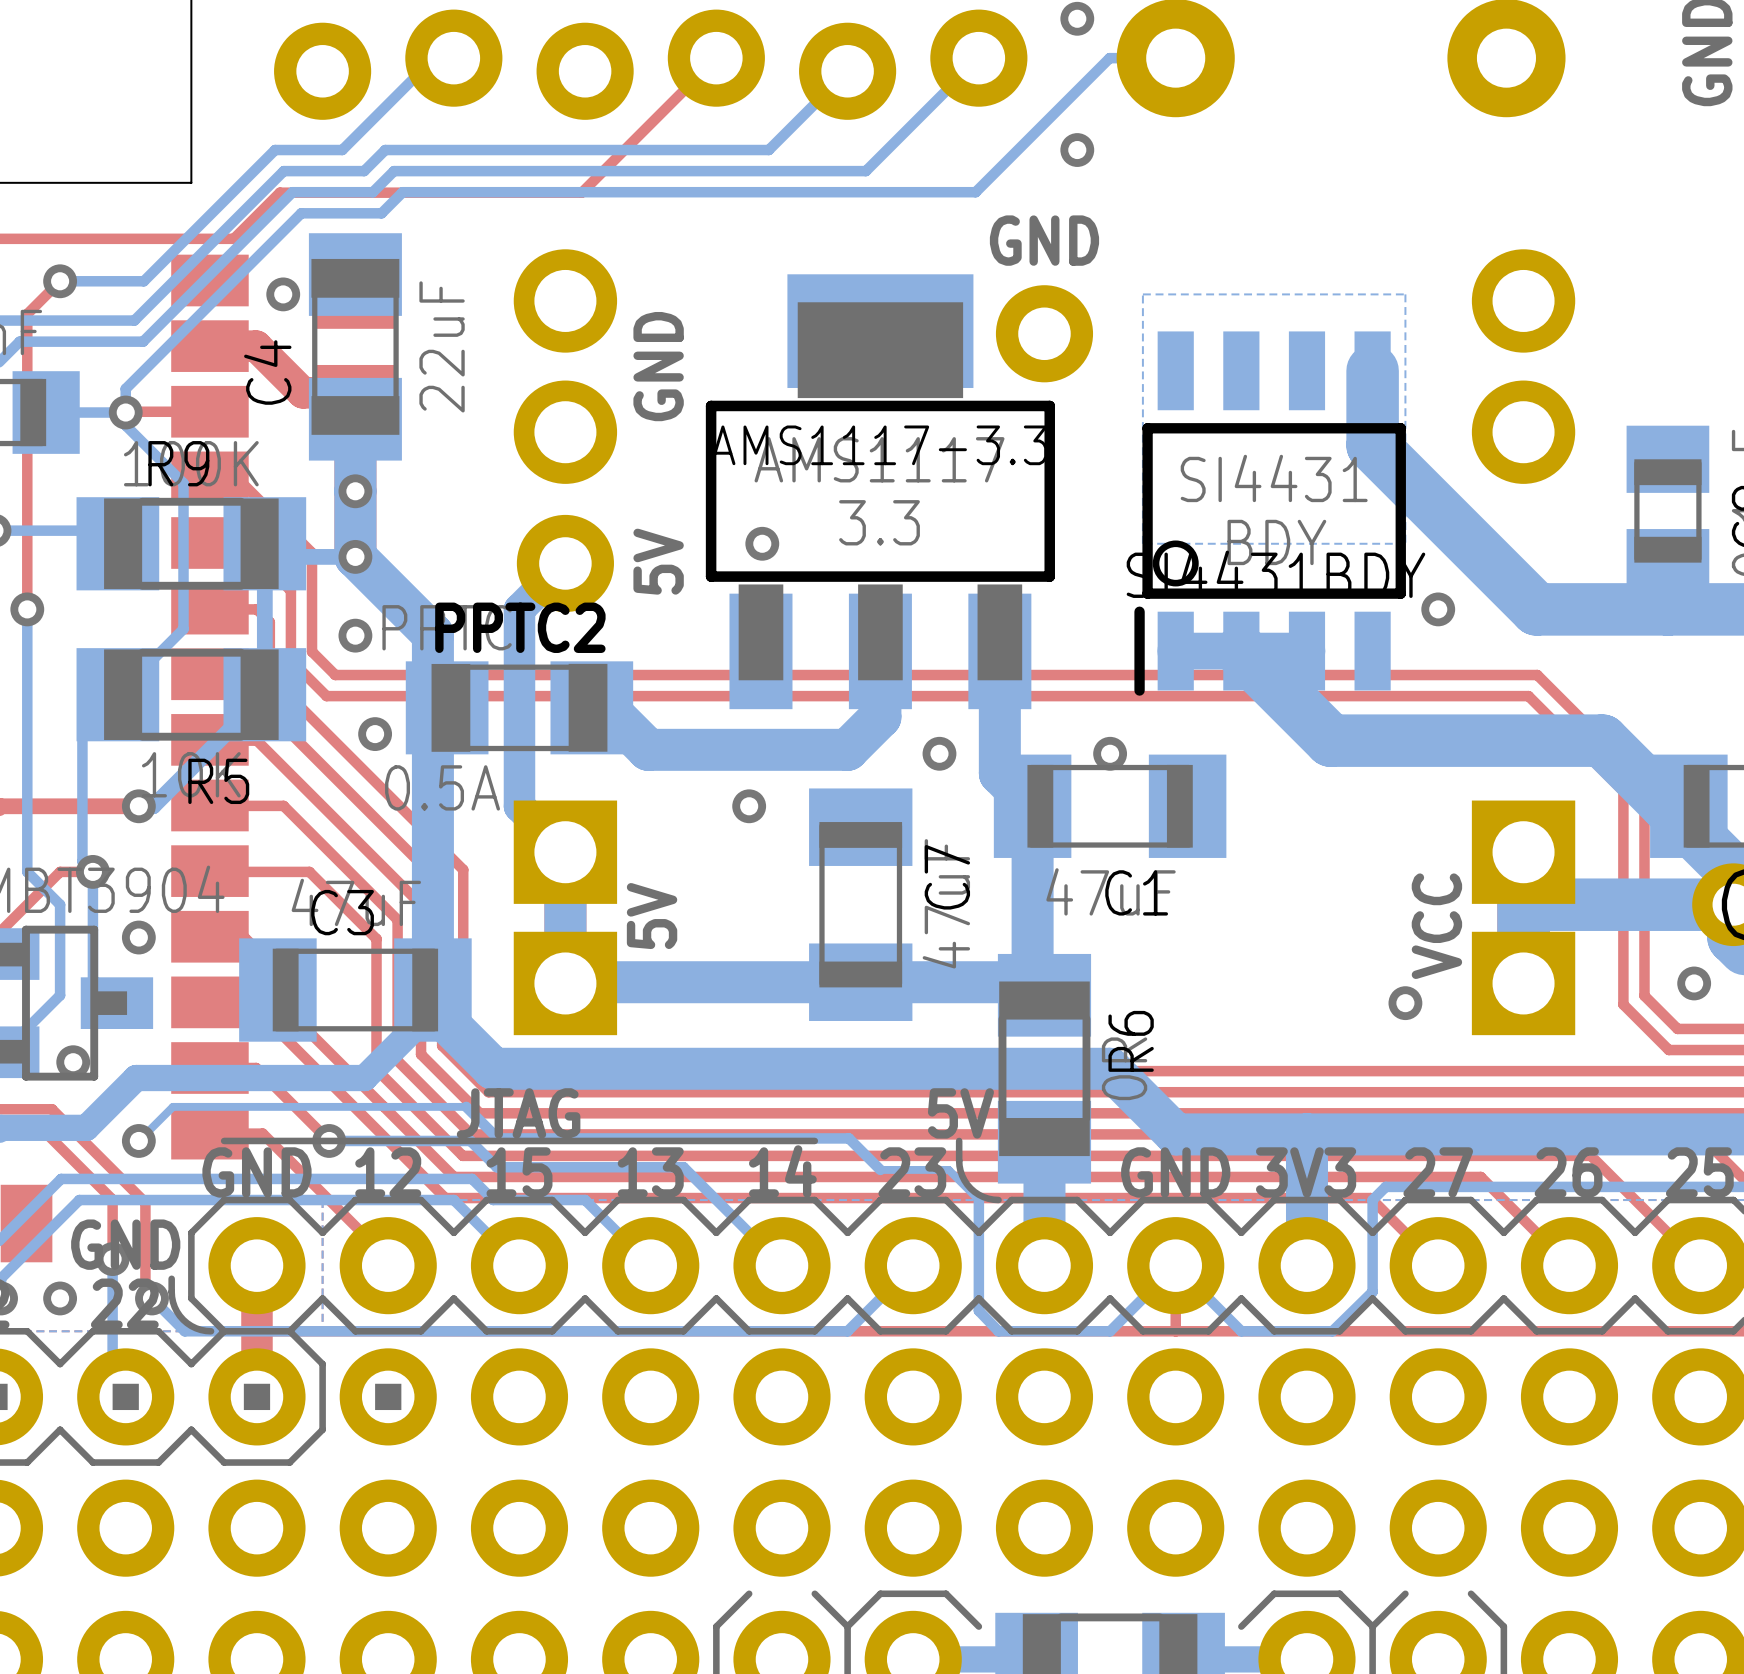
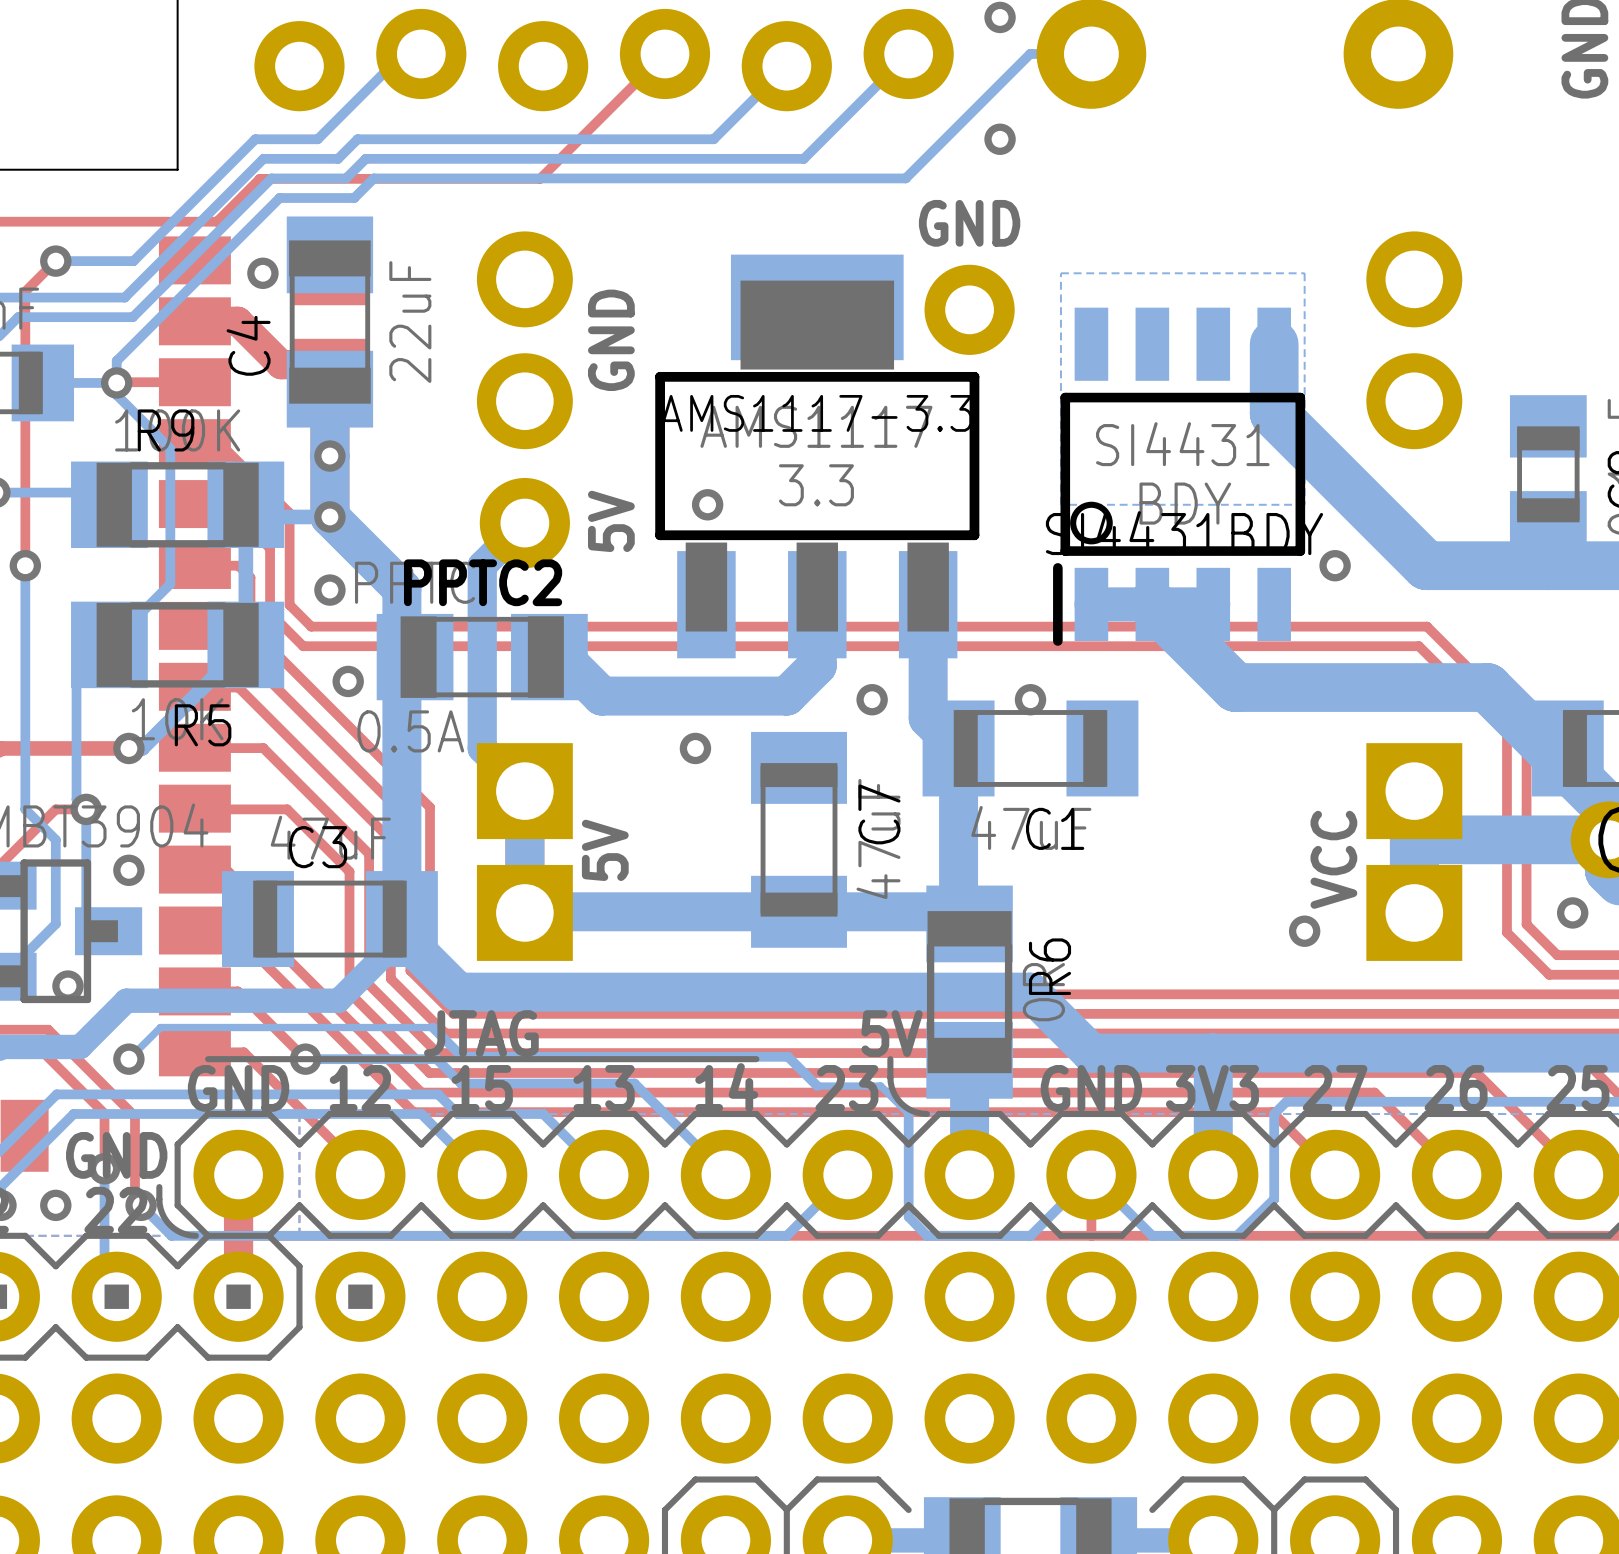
line: none -> (756, 1479) (695, 1479)
line: none -> (1365, 1479) (1304, 1479)

